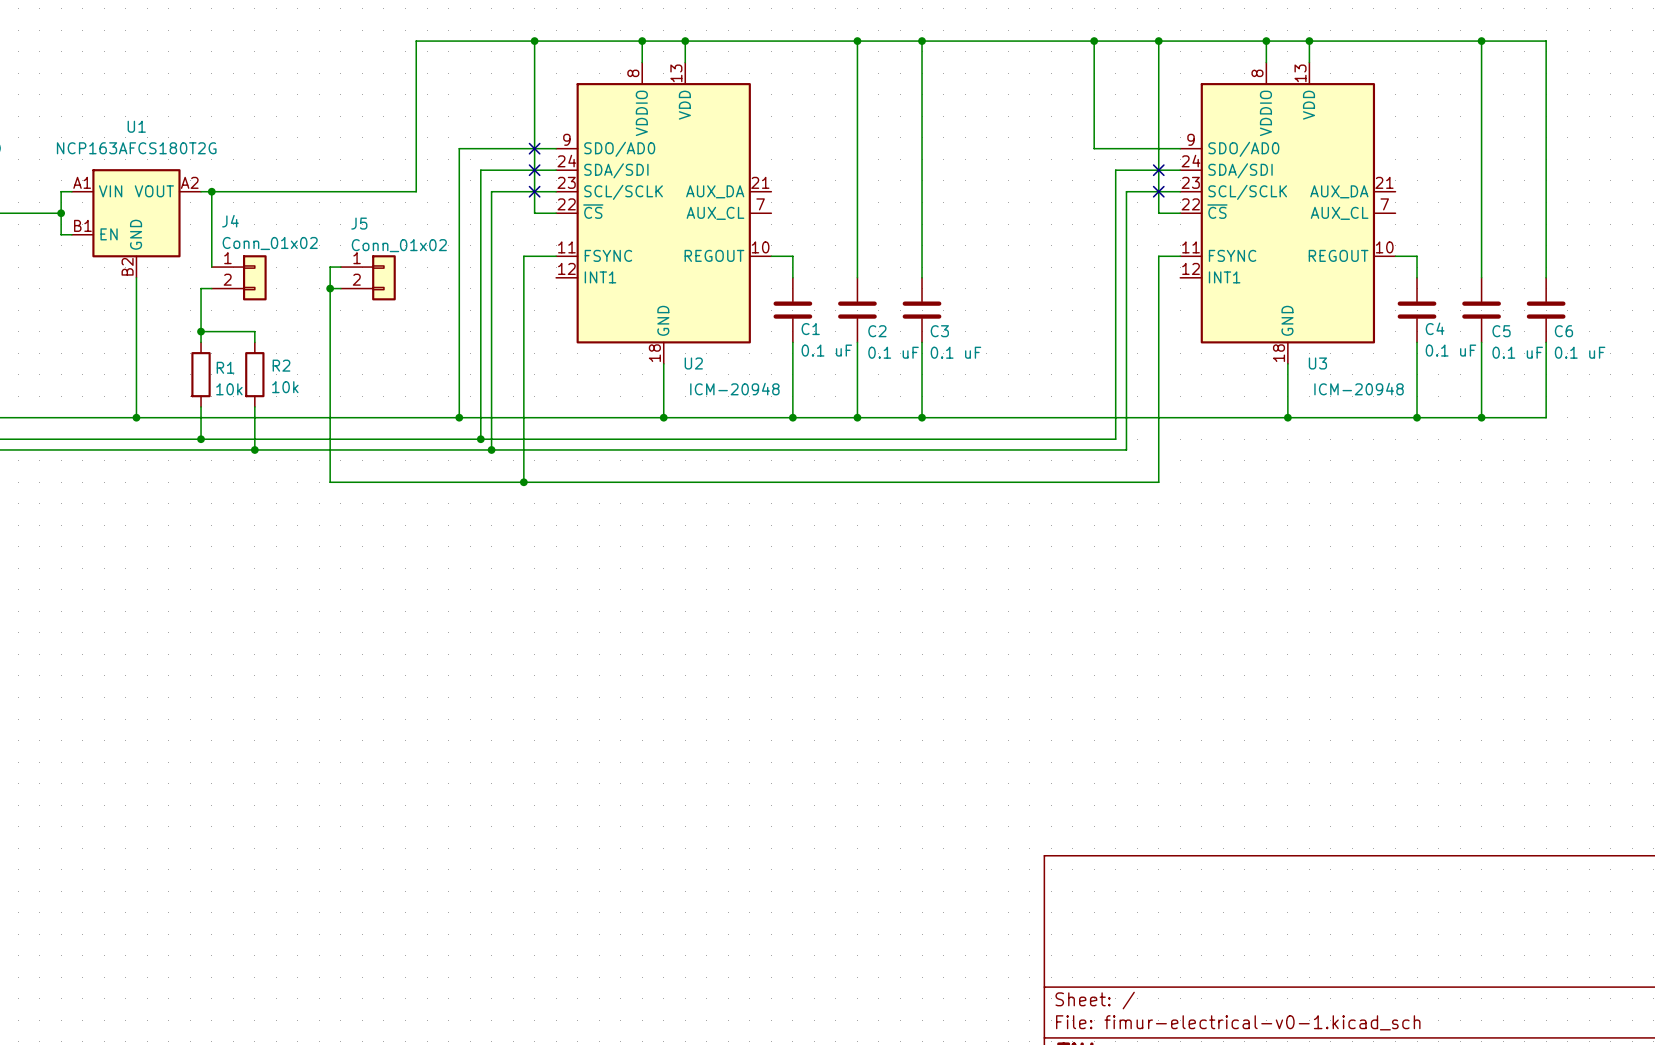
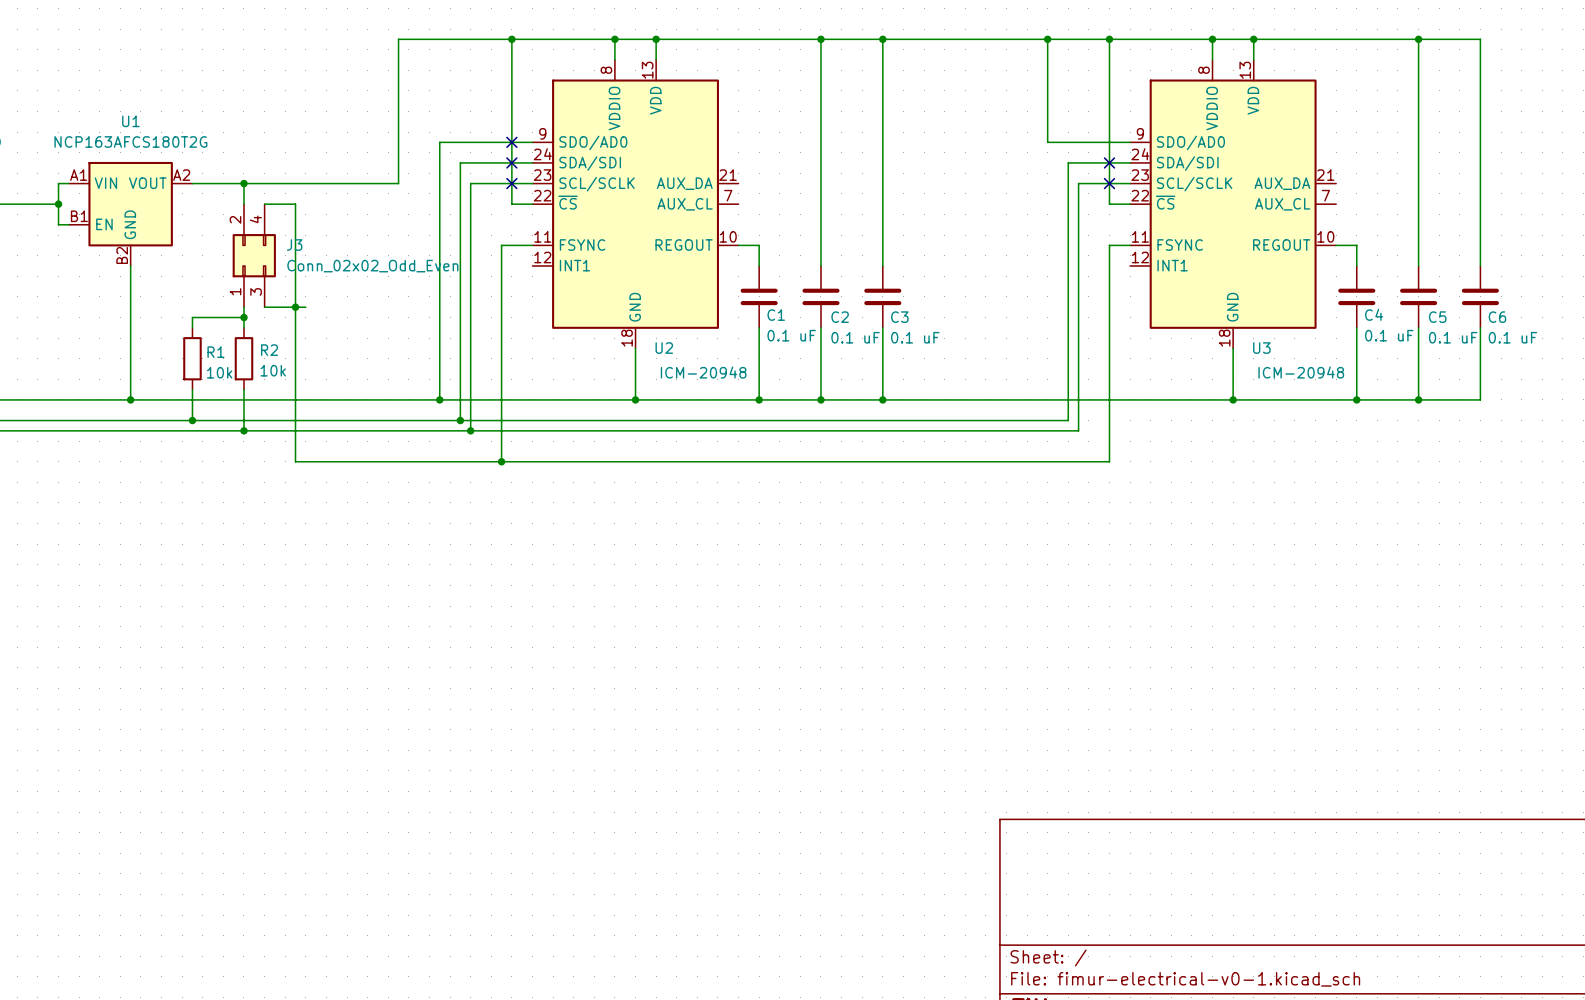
wire: (211, 191) (211, 267) -> none
junction position: (211, 191) -> (243, 183)
wire: none -> (243, 183) (243, 204)
J3: none -> Conn_02x02_Odd_Even (254, 255)
wire: (340, 267) (330, 267) (330, 482) -> (264, 204) (295, 204) (295, 461) (316, 461)
J4: Conn_01x02 (239, 277) -> none
J5: Conn_01x02 (368, 277) -> none
wire: (211, 288) (201, 288) (201, 331) -> none
wire: (330, 288) (340, 288) -> none
junction position: (330, 288) -> (295, 307)
wire: none -> (243, 307) (243, 317)
wire: none -> (264, 307) (305, 307)
junction: (201, 331) -> none
junction: none -> (243, 317)

